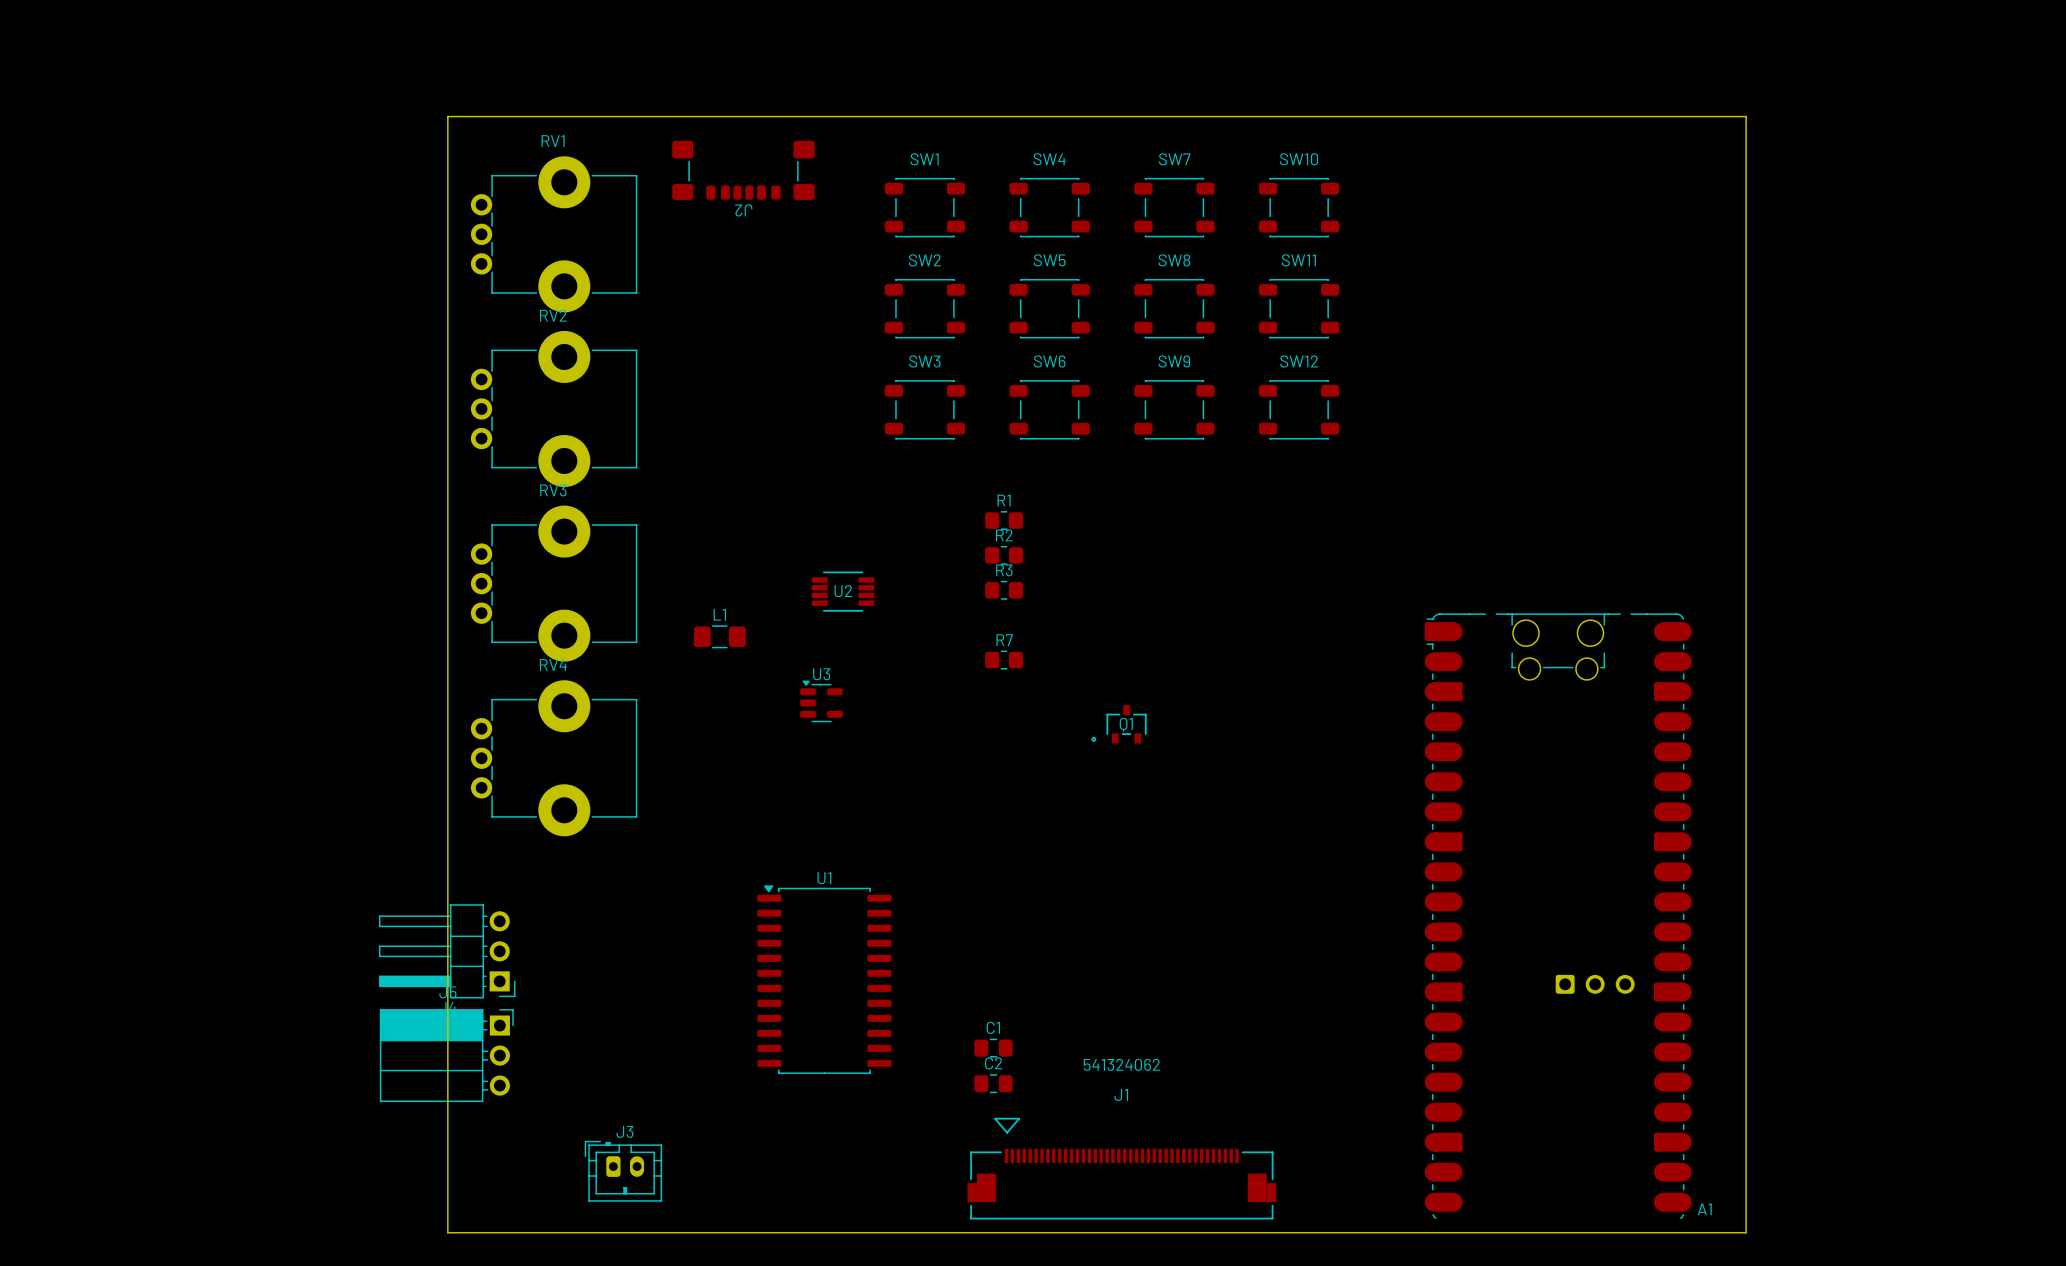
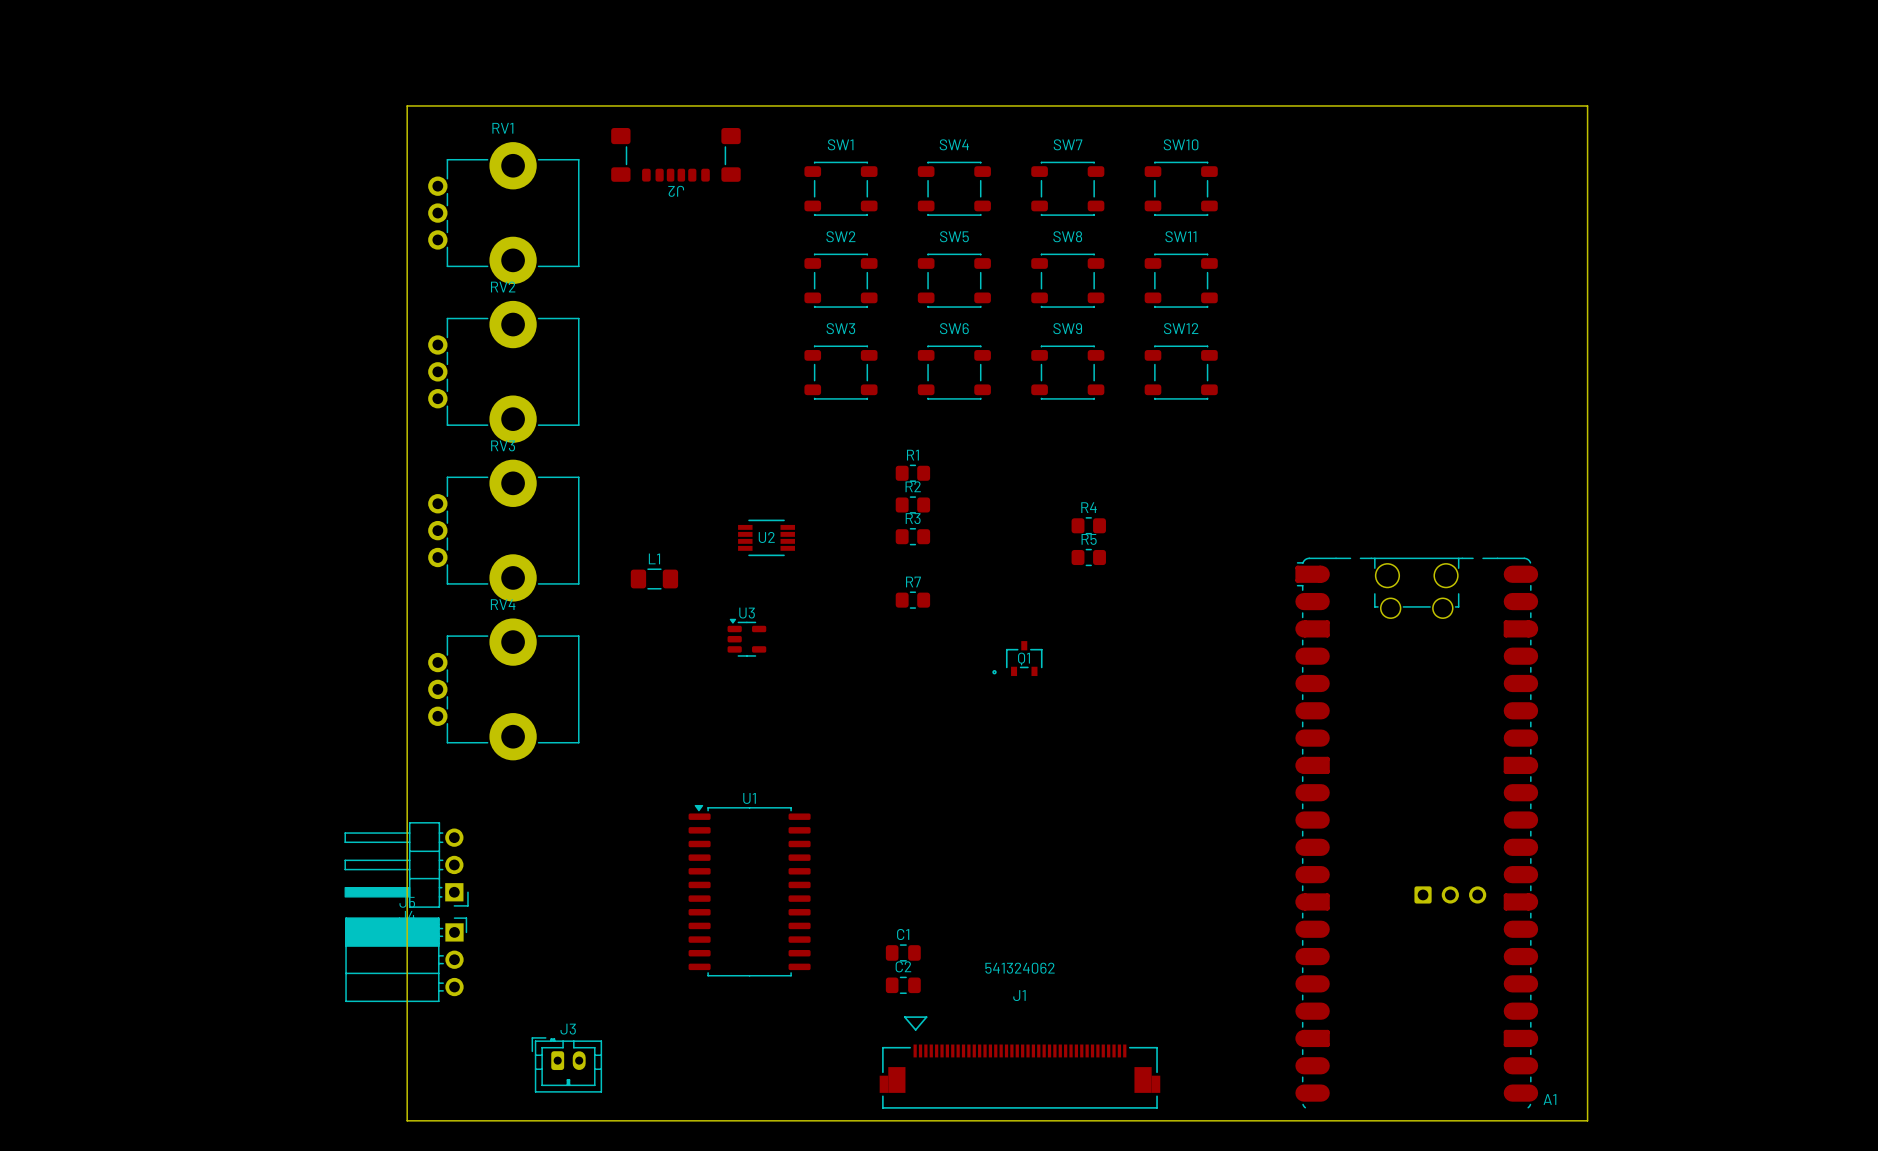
R4: none -> (1088, 525)
R5: none -> (1088, 557)

